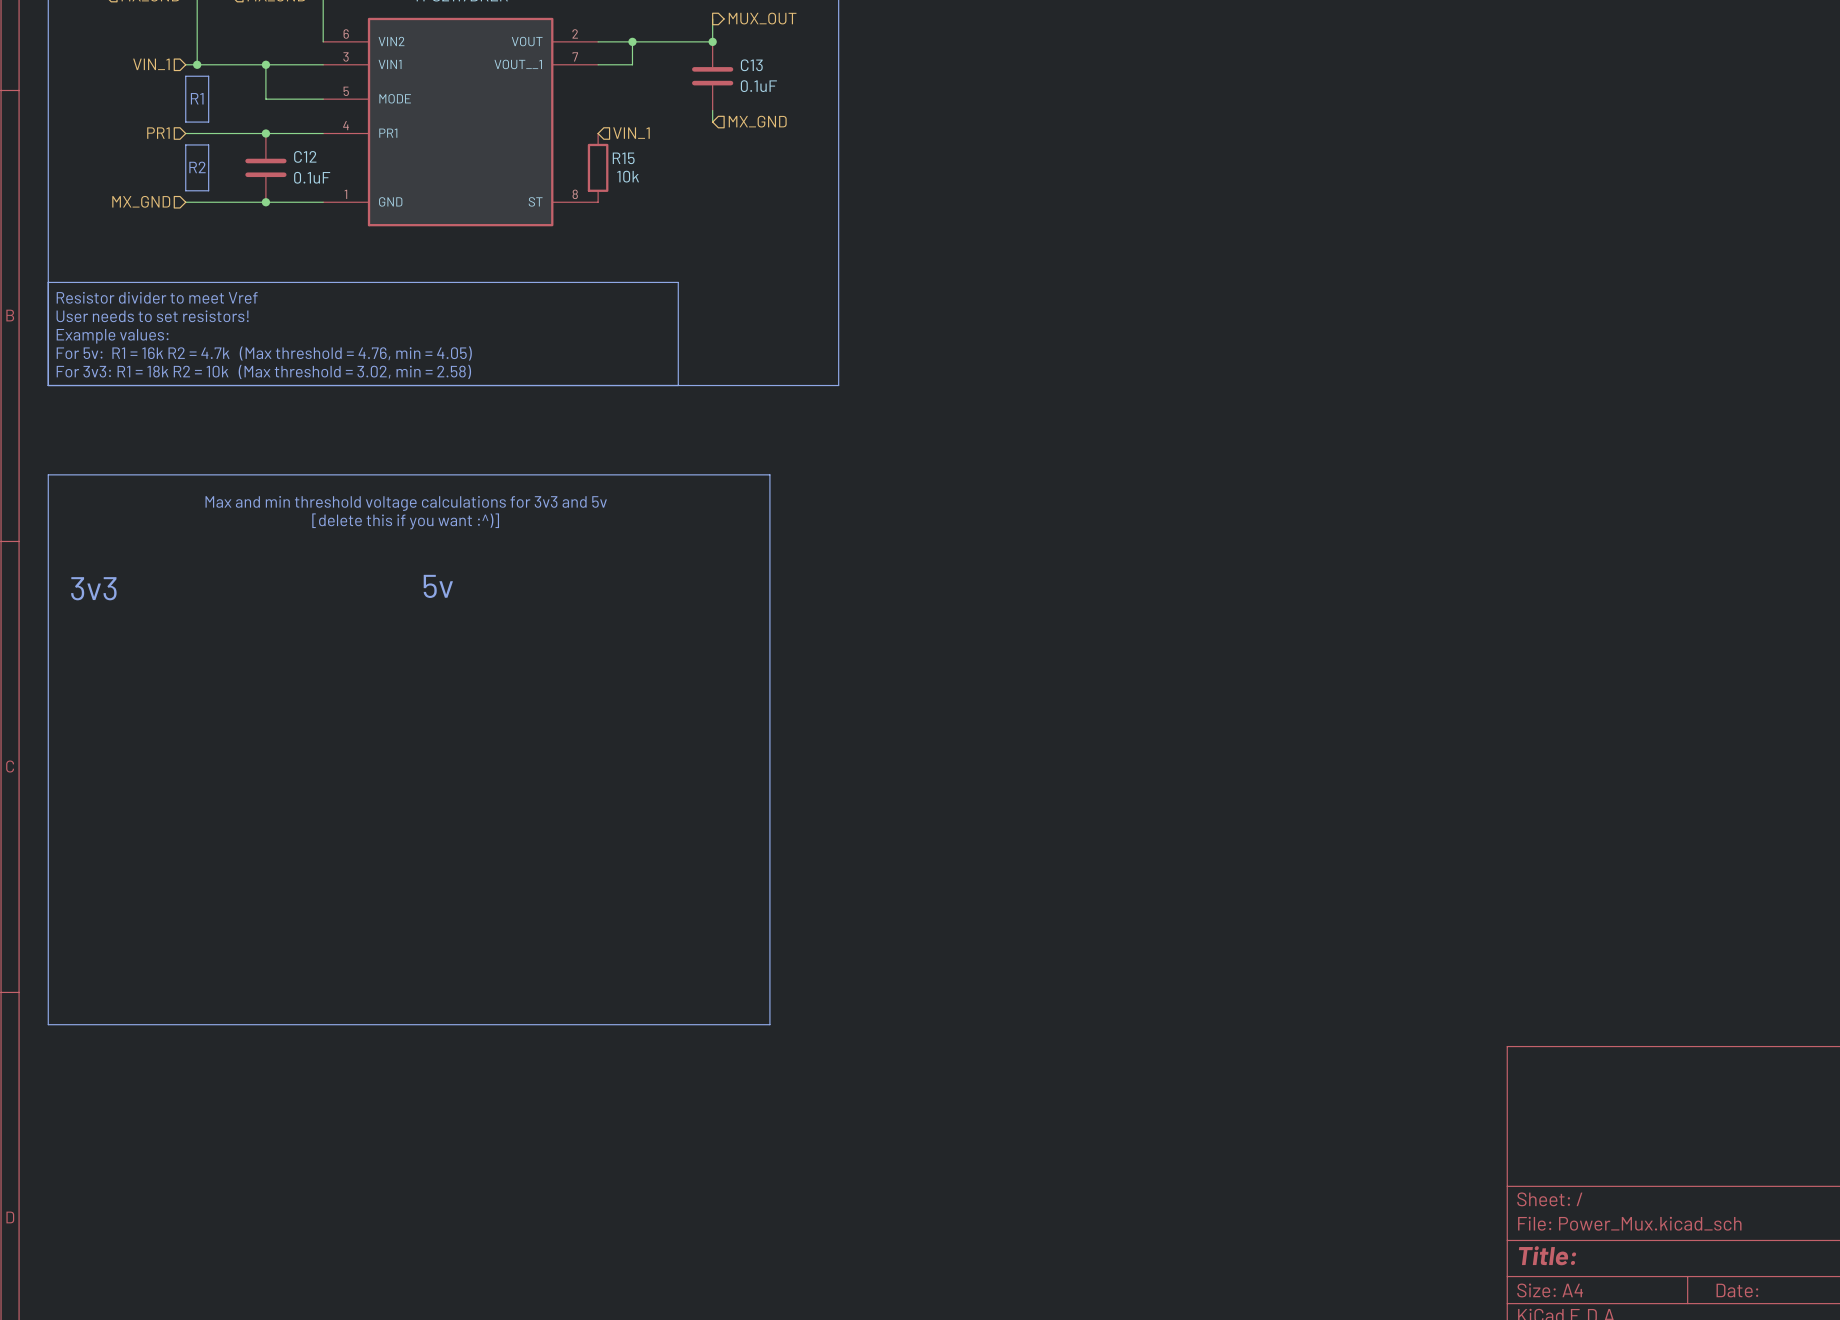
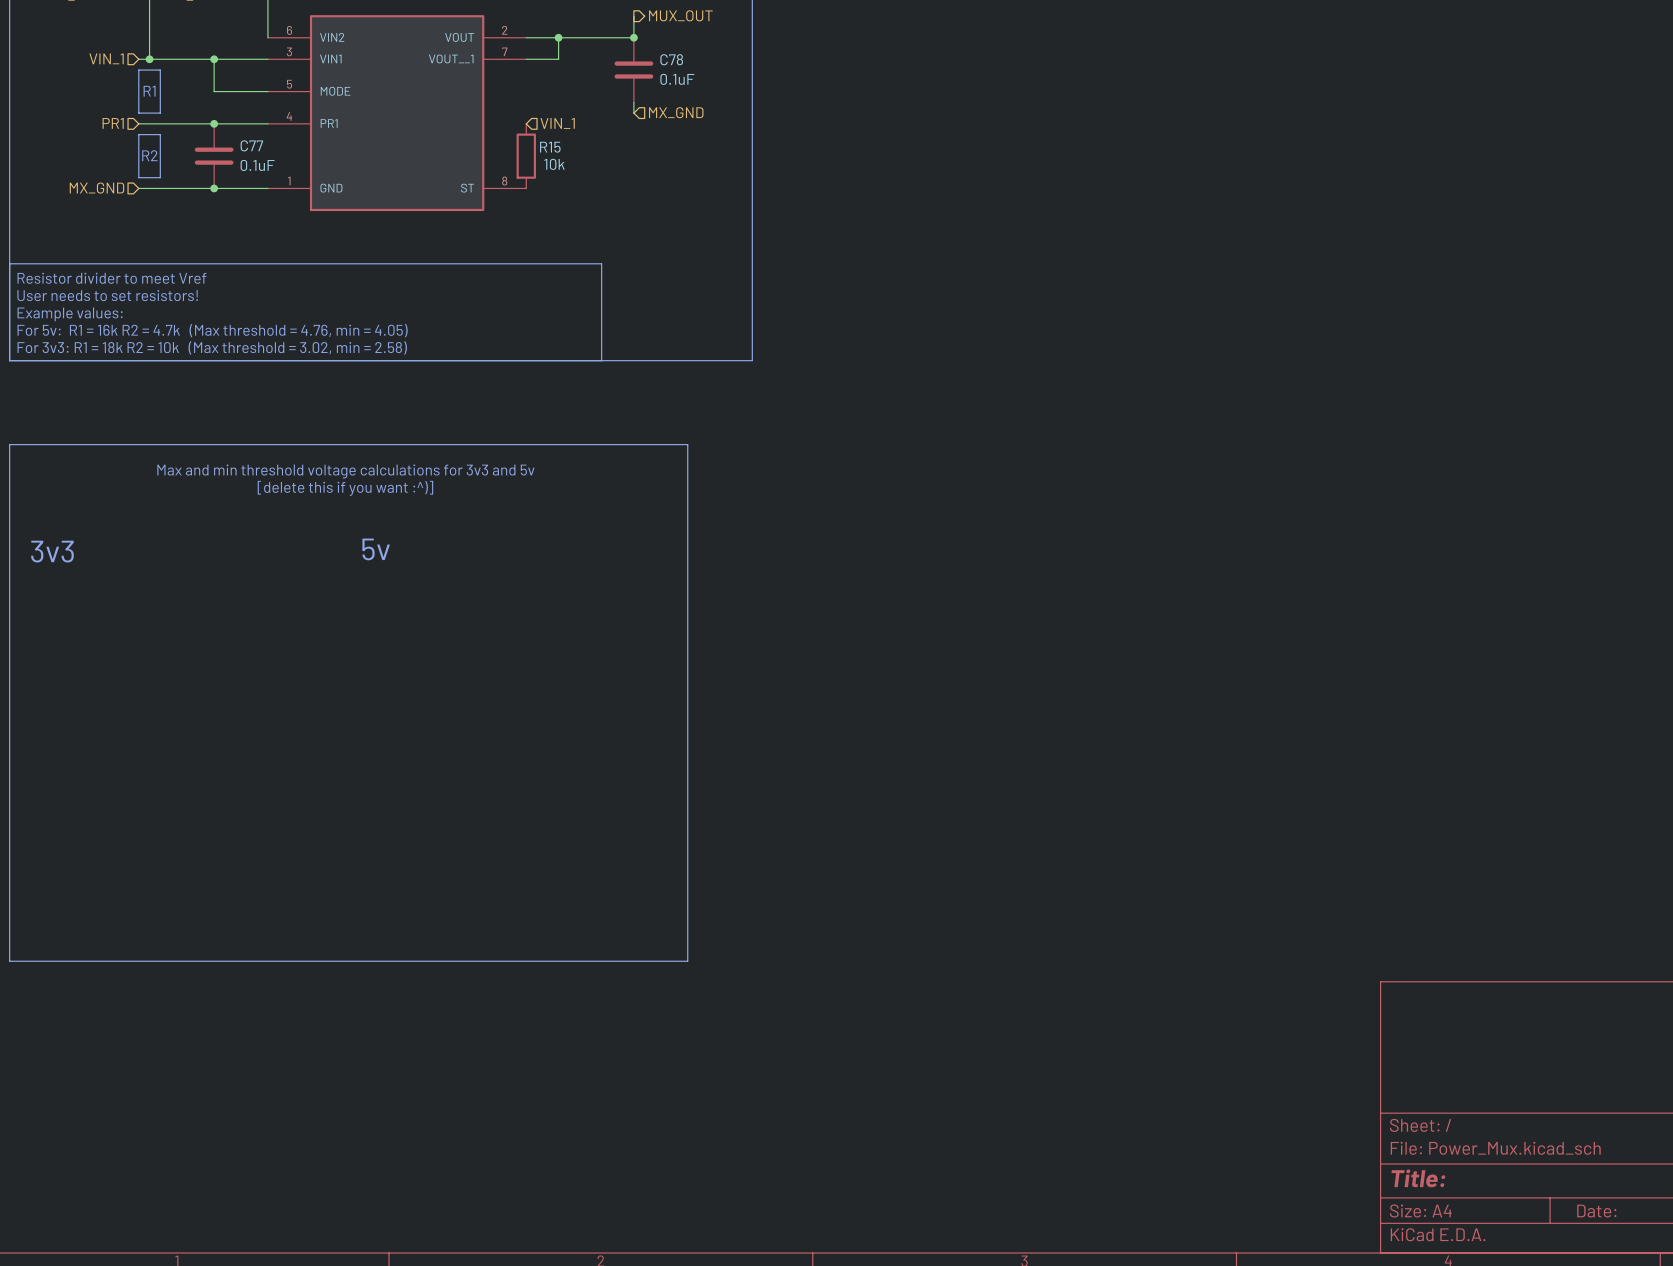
C13 name: C13 (751, 65) -> C78 (671, 59)
C12 name: C12 (305, 156) -> C77 (251, 145)

